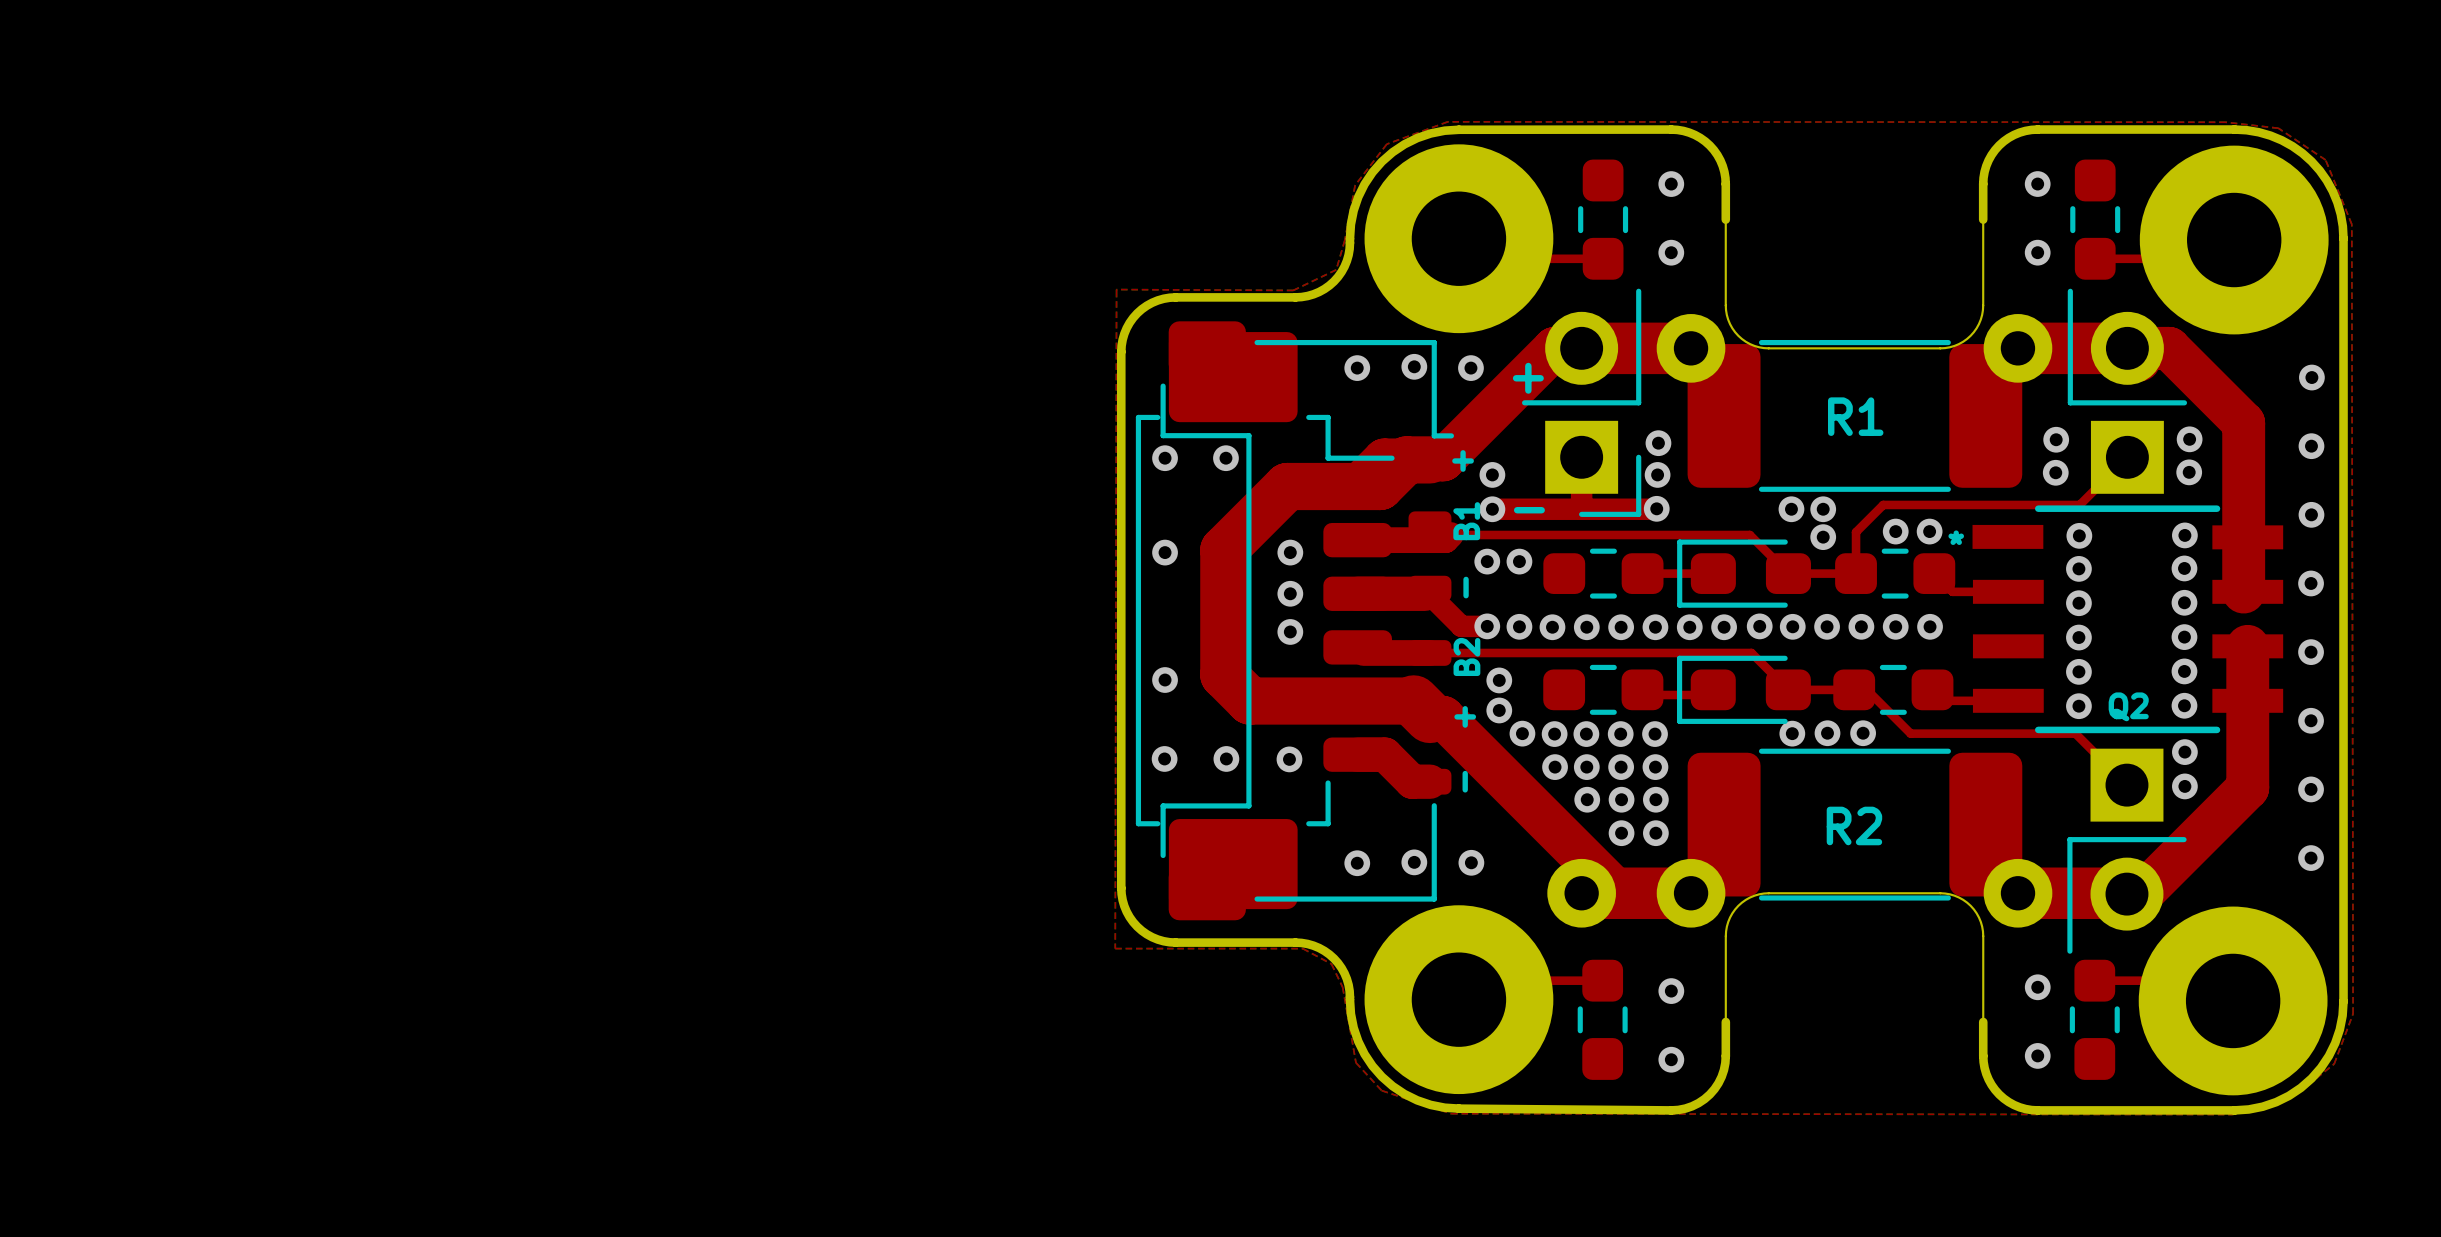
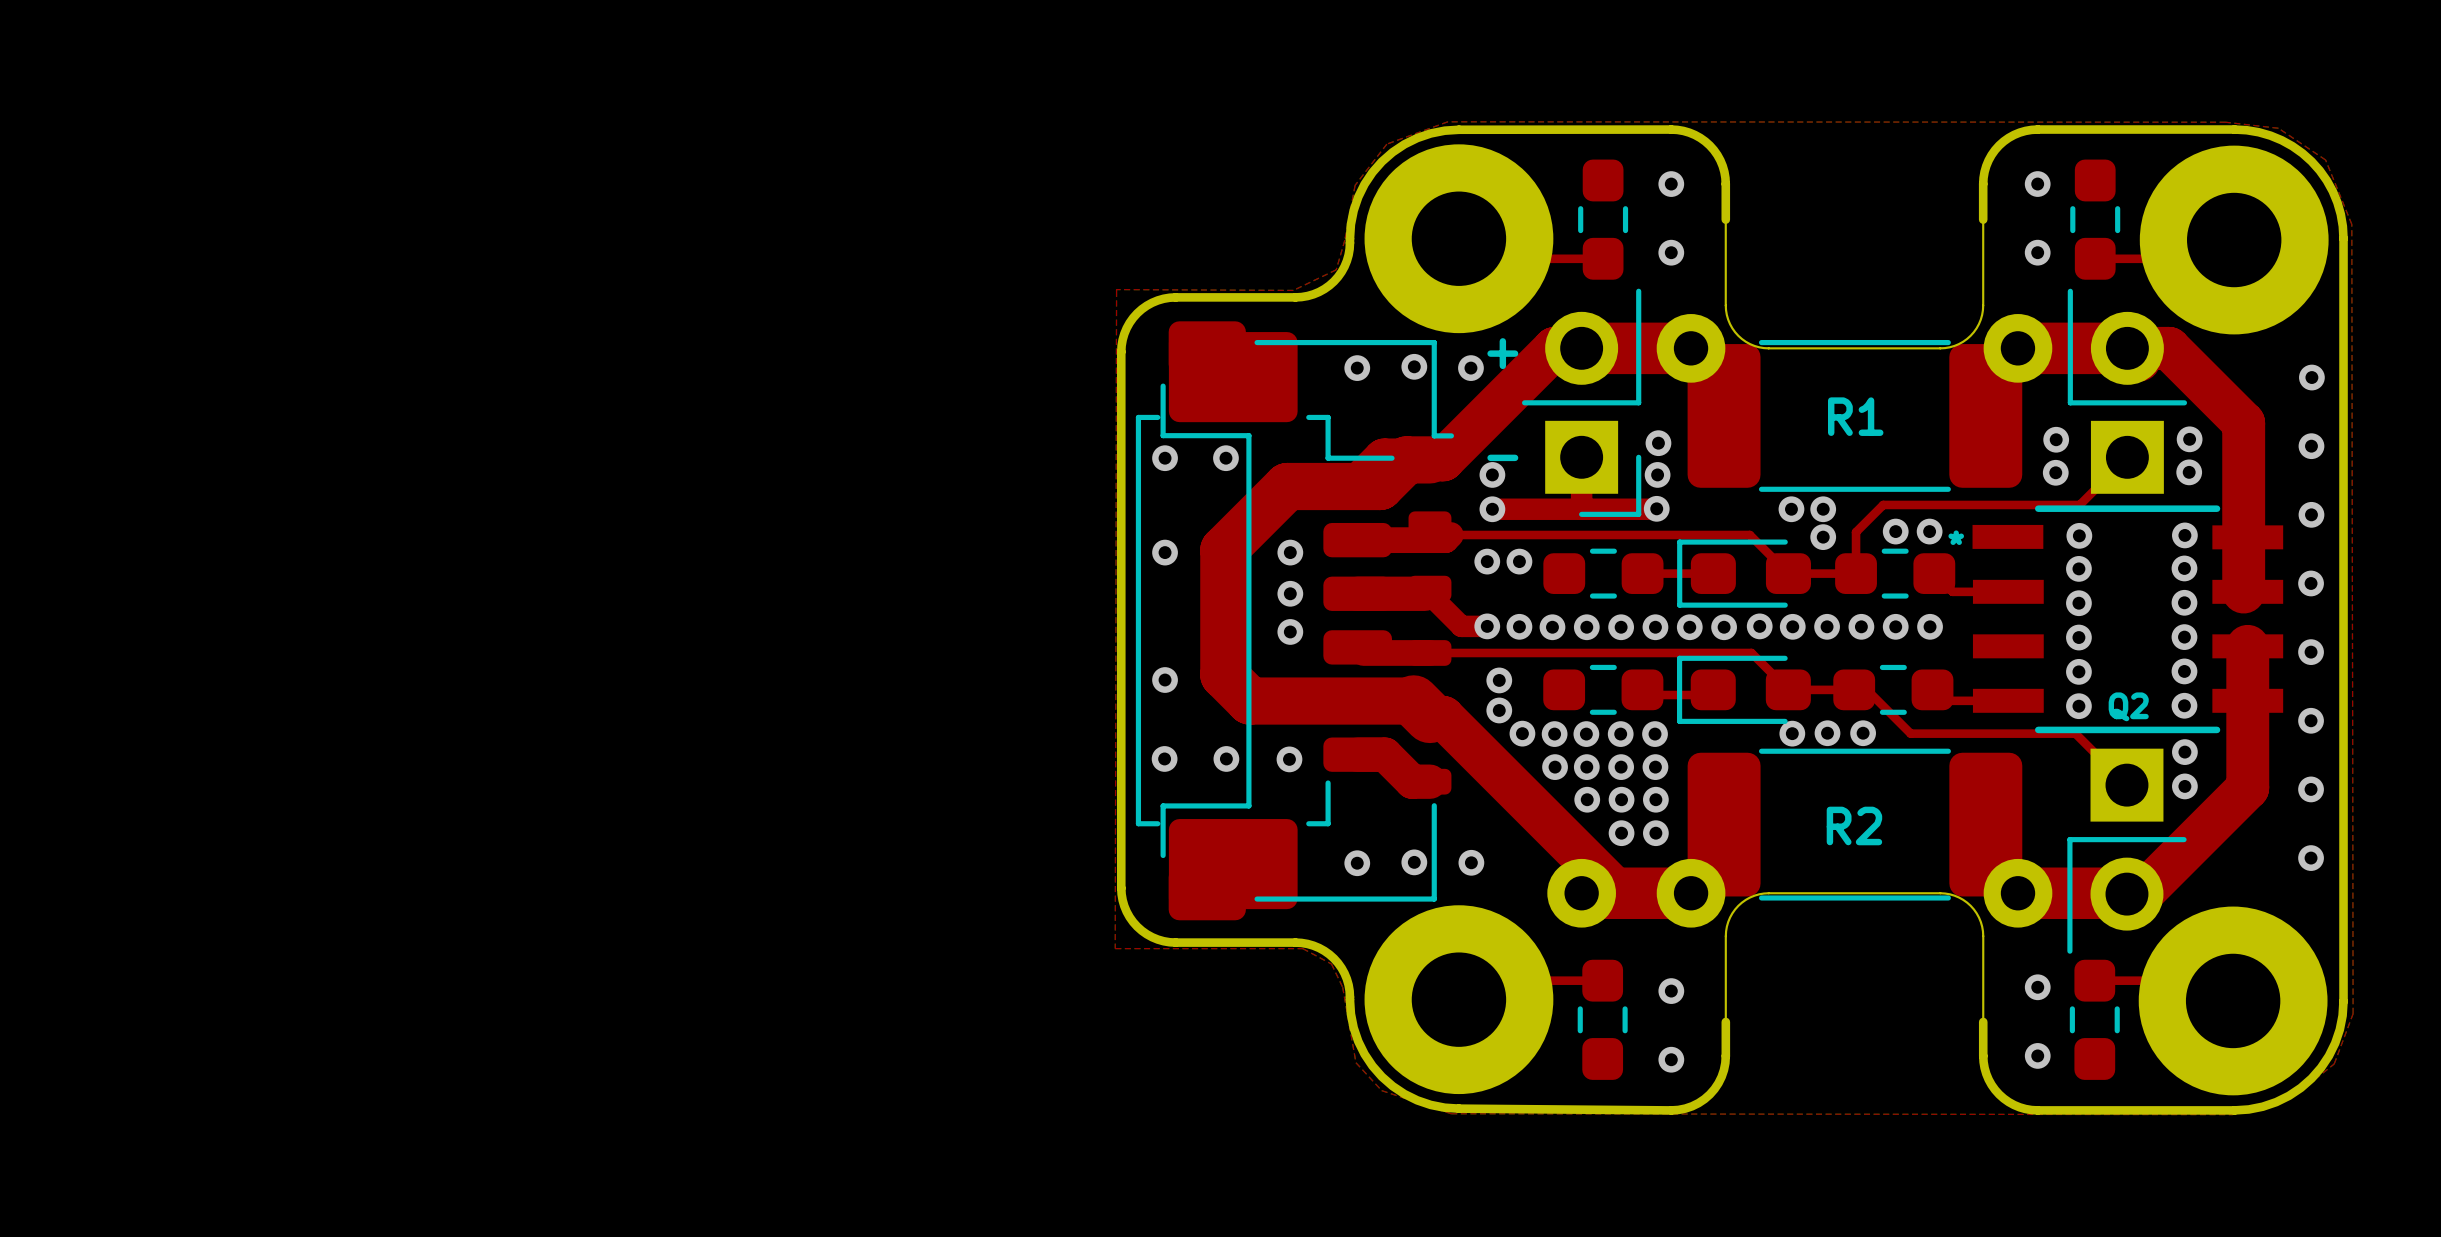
text position: + (1528, 378) -> + (1502, 353)
text: + (1463, 460) -> - (1502, 457)
text: - (1529, 510) -> none
text: B1 (1466, 521) -> none
text: - (1466, 587) -> none
text: B2 (1466, 656) -> none
text: + (1465, 716) -> none
text: - (1465, 781) -> none

